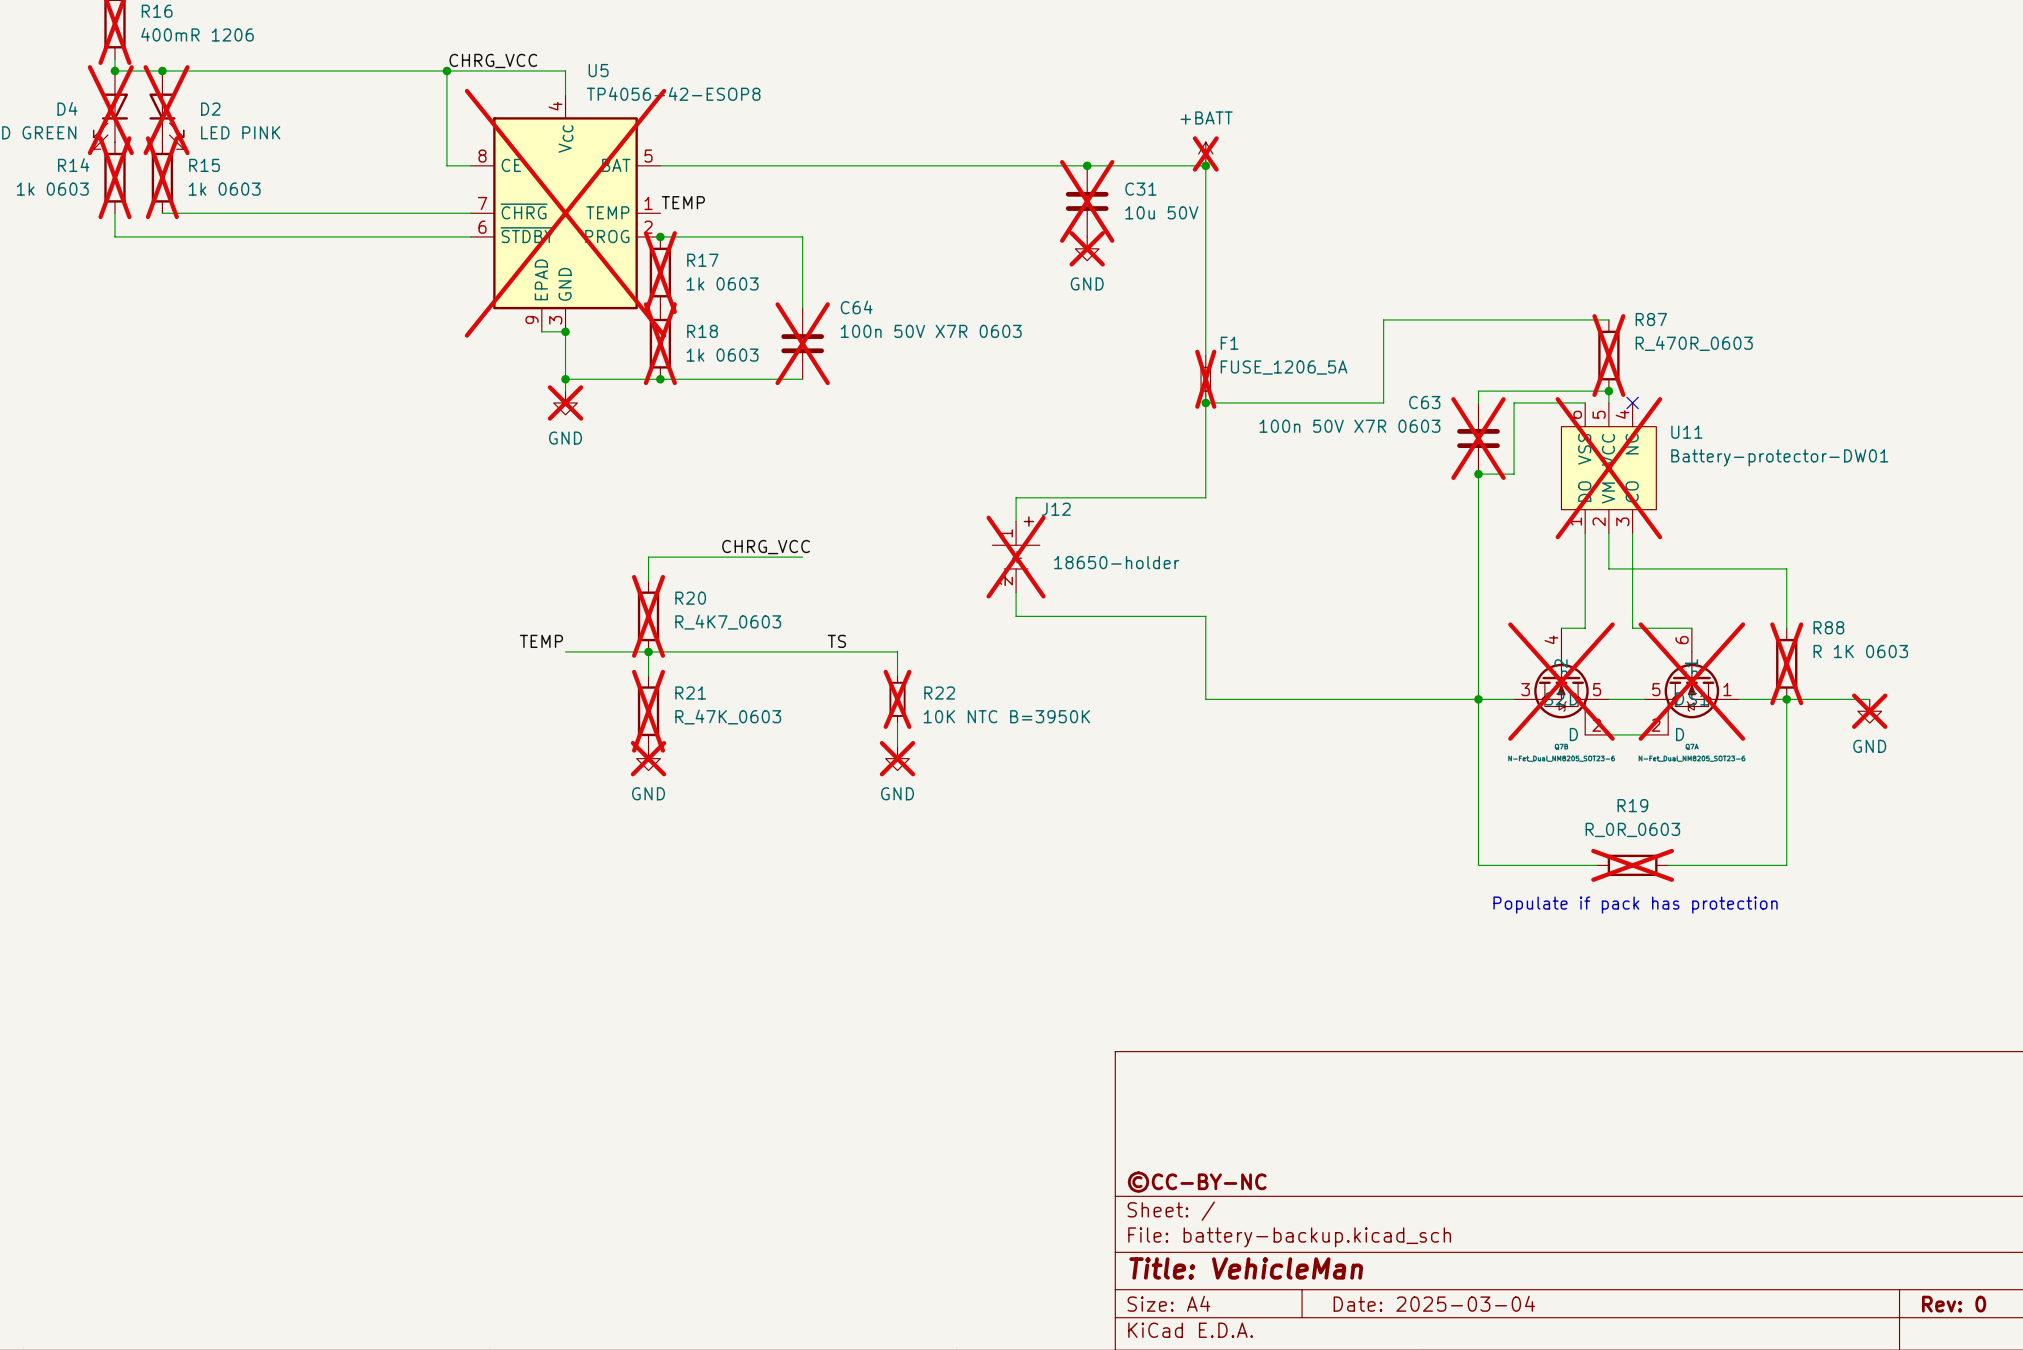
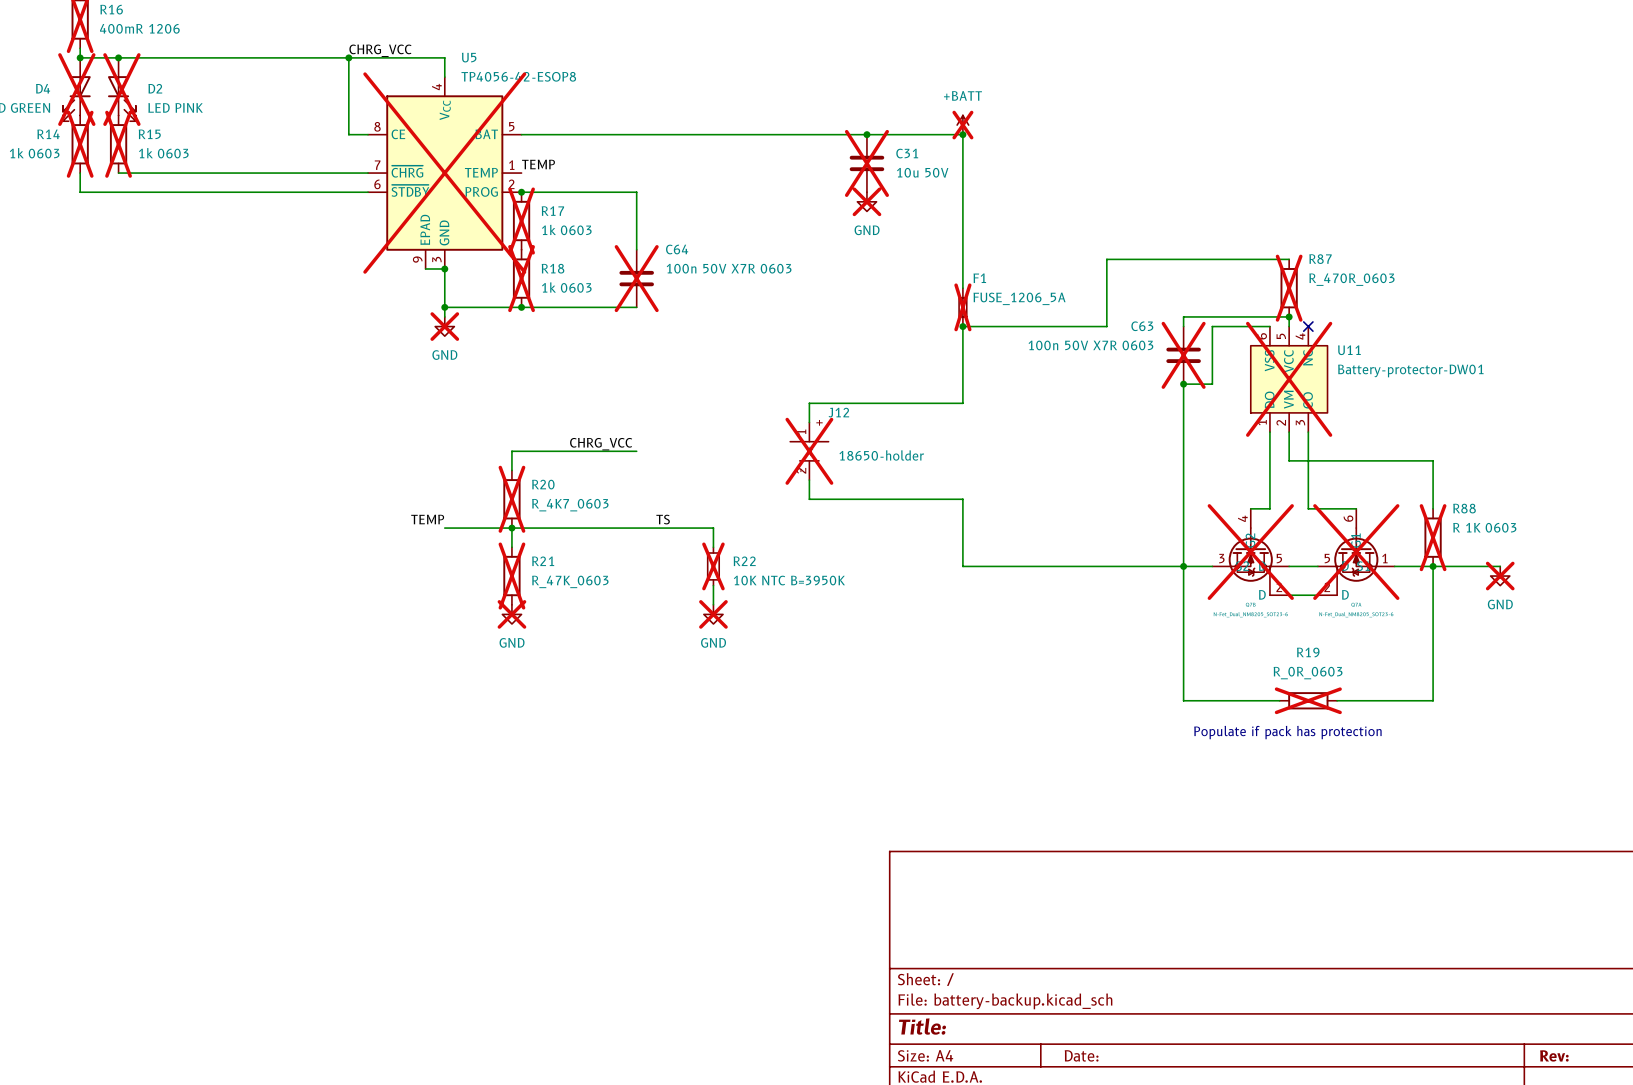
title block: ©CC-BY-NC (1197, 1182) -> none
title block: Title: VehicleMan (1246, 1268) -> Title: (922, 1026)
title block: Date: 2025-03-04 (1434, 1303) -> Date: (1081, 1055)
title block: Rev: 0 (1954, 1304) -> Rev: (1554, 1055)

